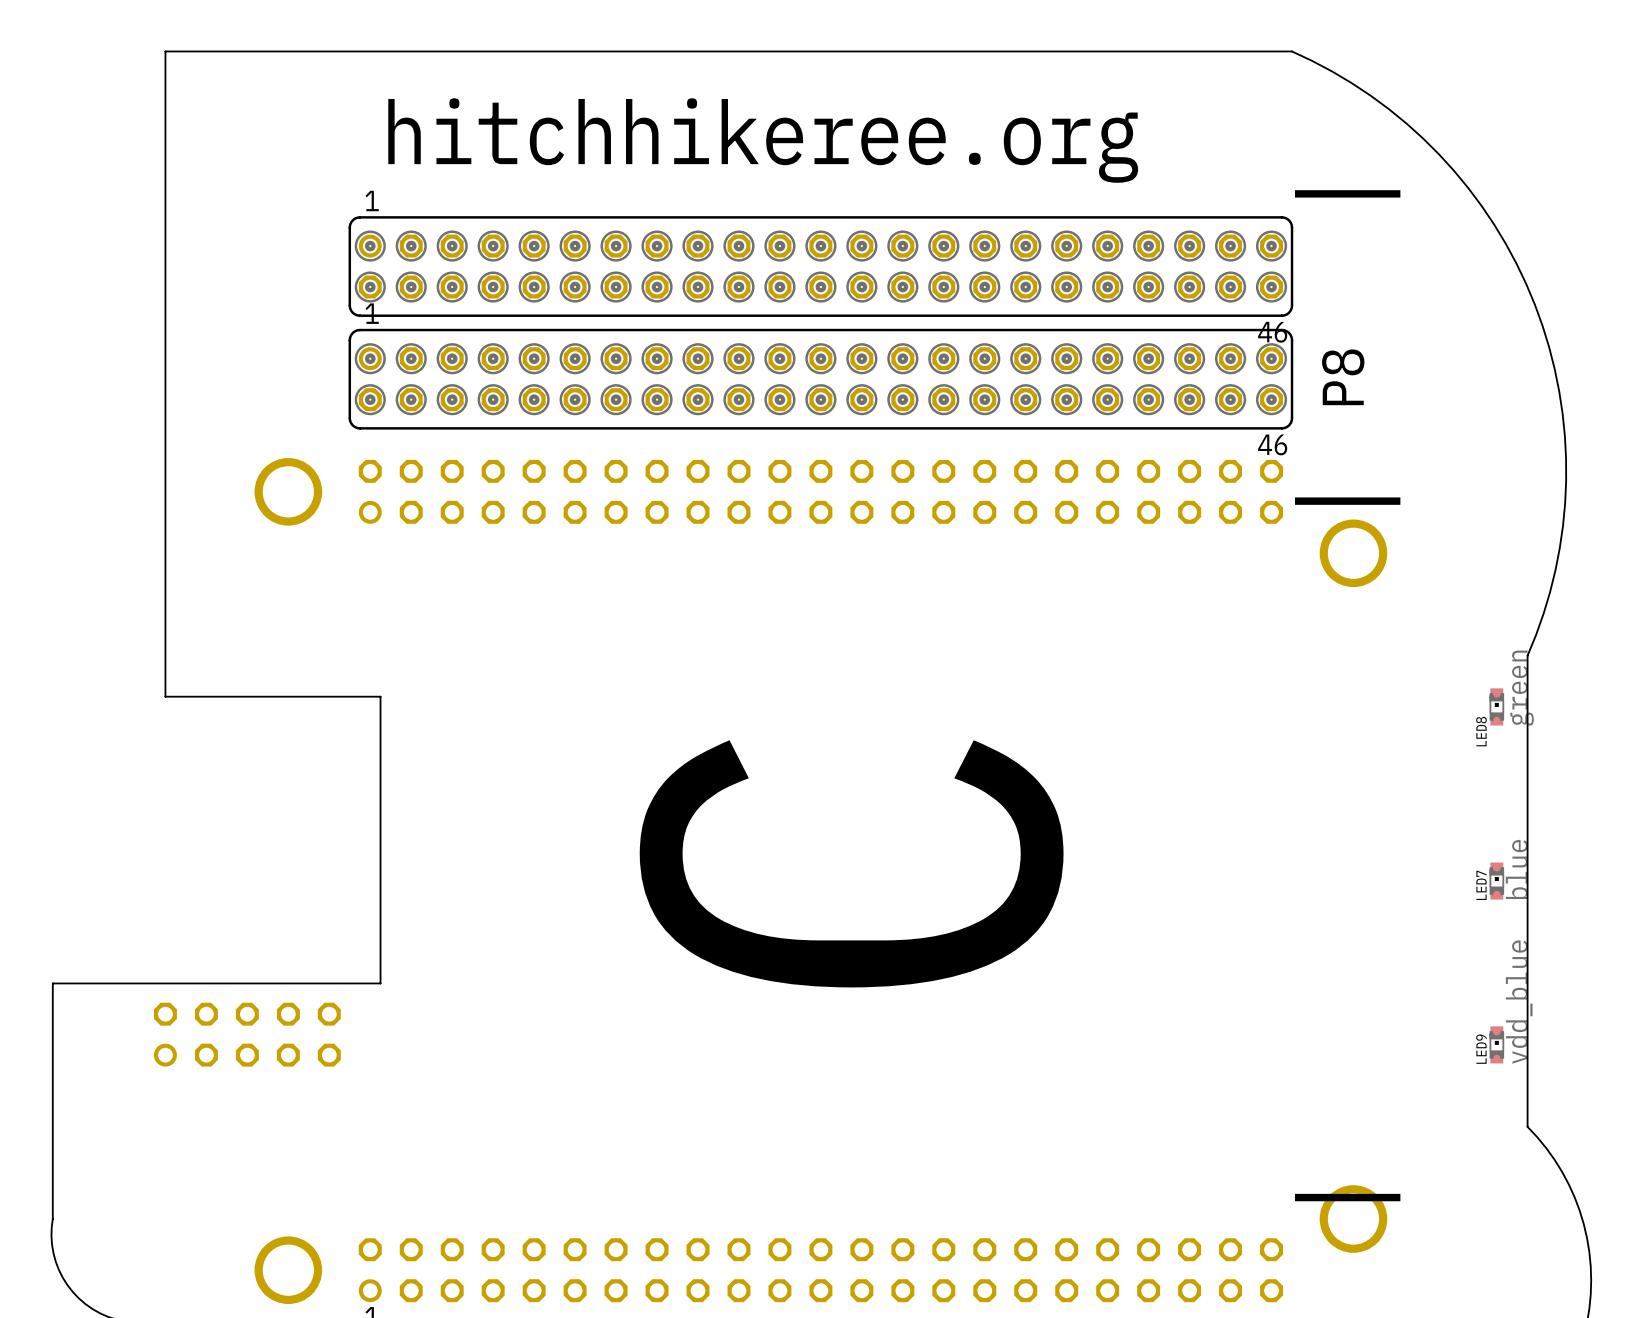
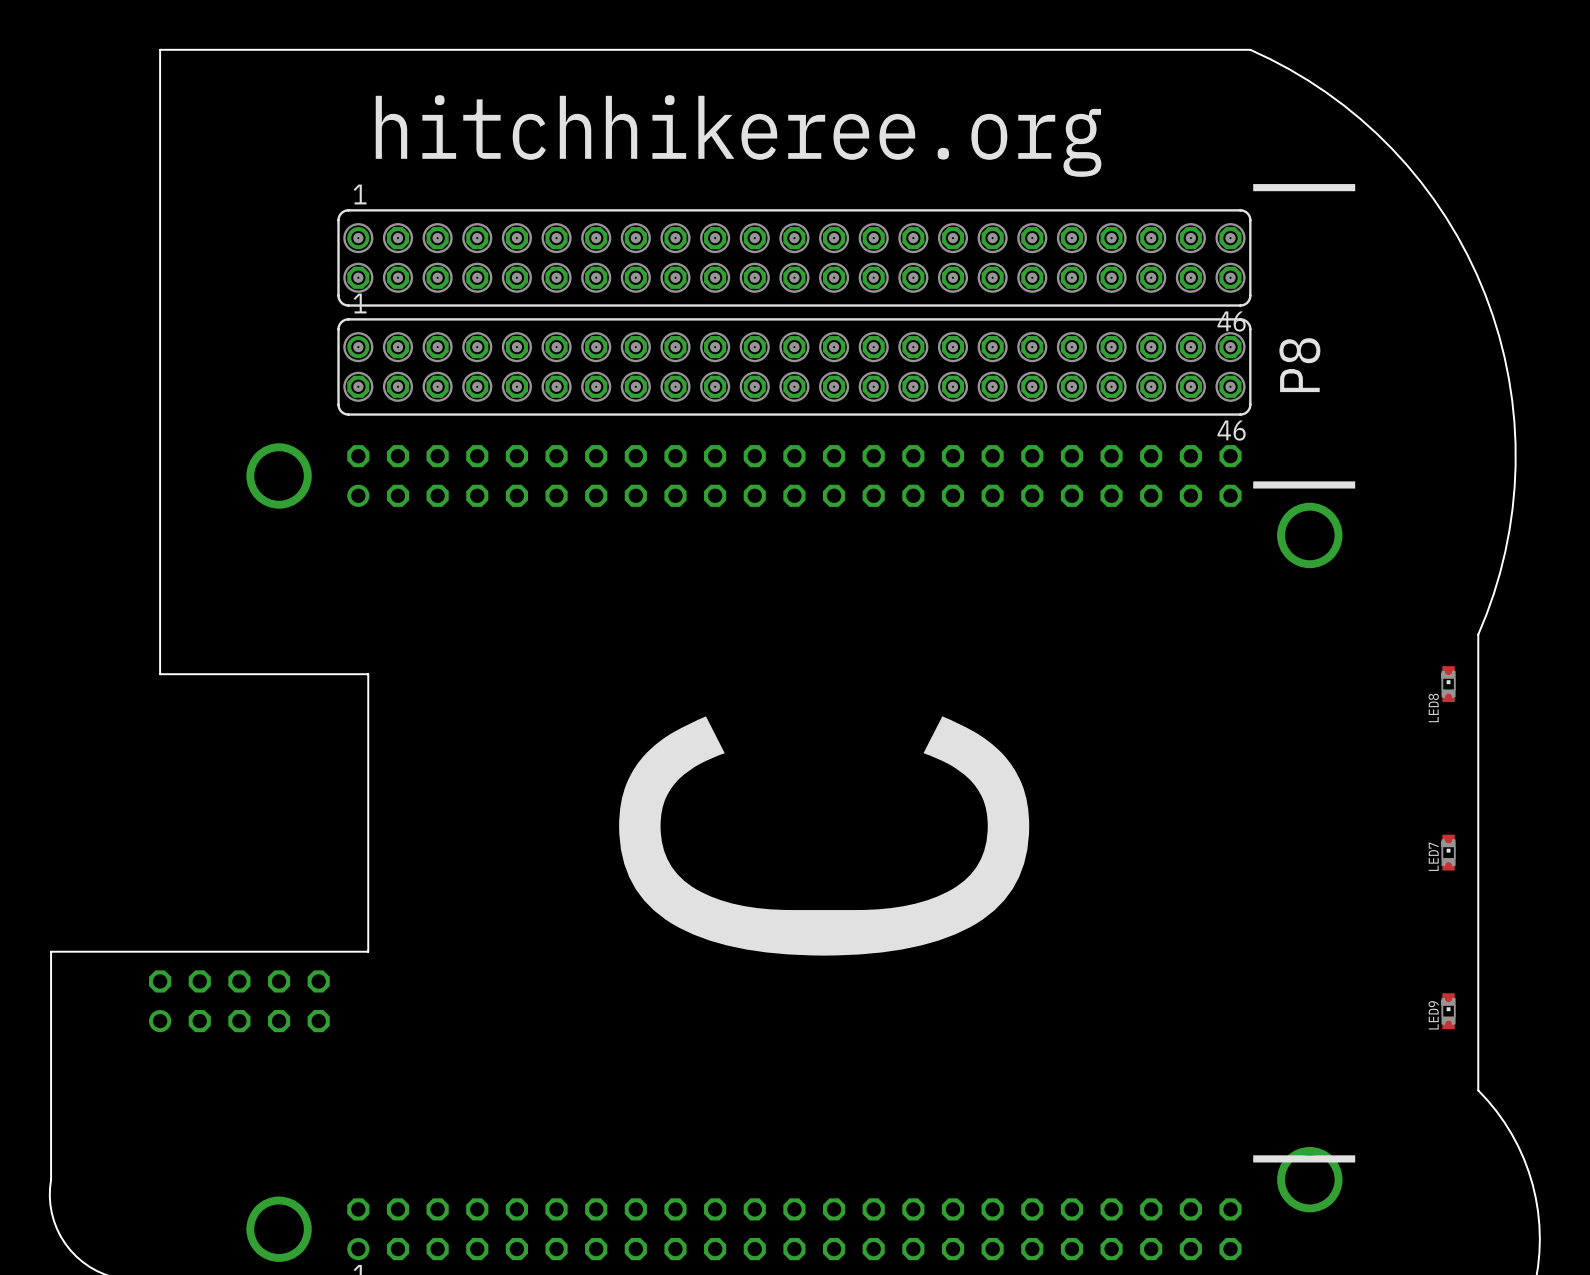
LED8 value: green (1522, 688) -> none
LED7 value: blue (1516, 869) -> none
LED9 value: vdd_blue (1519, 1002) -> none

